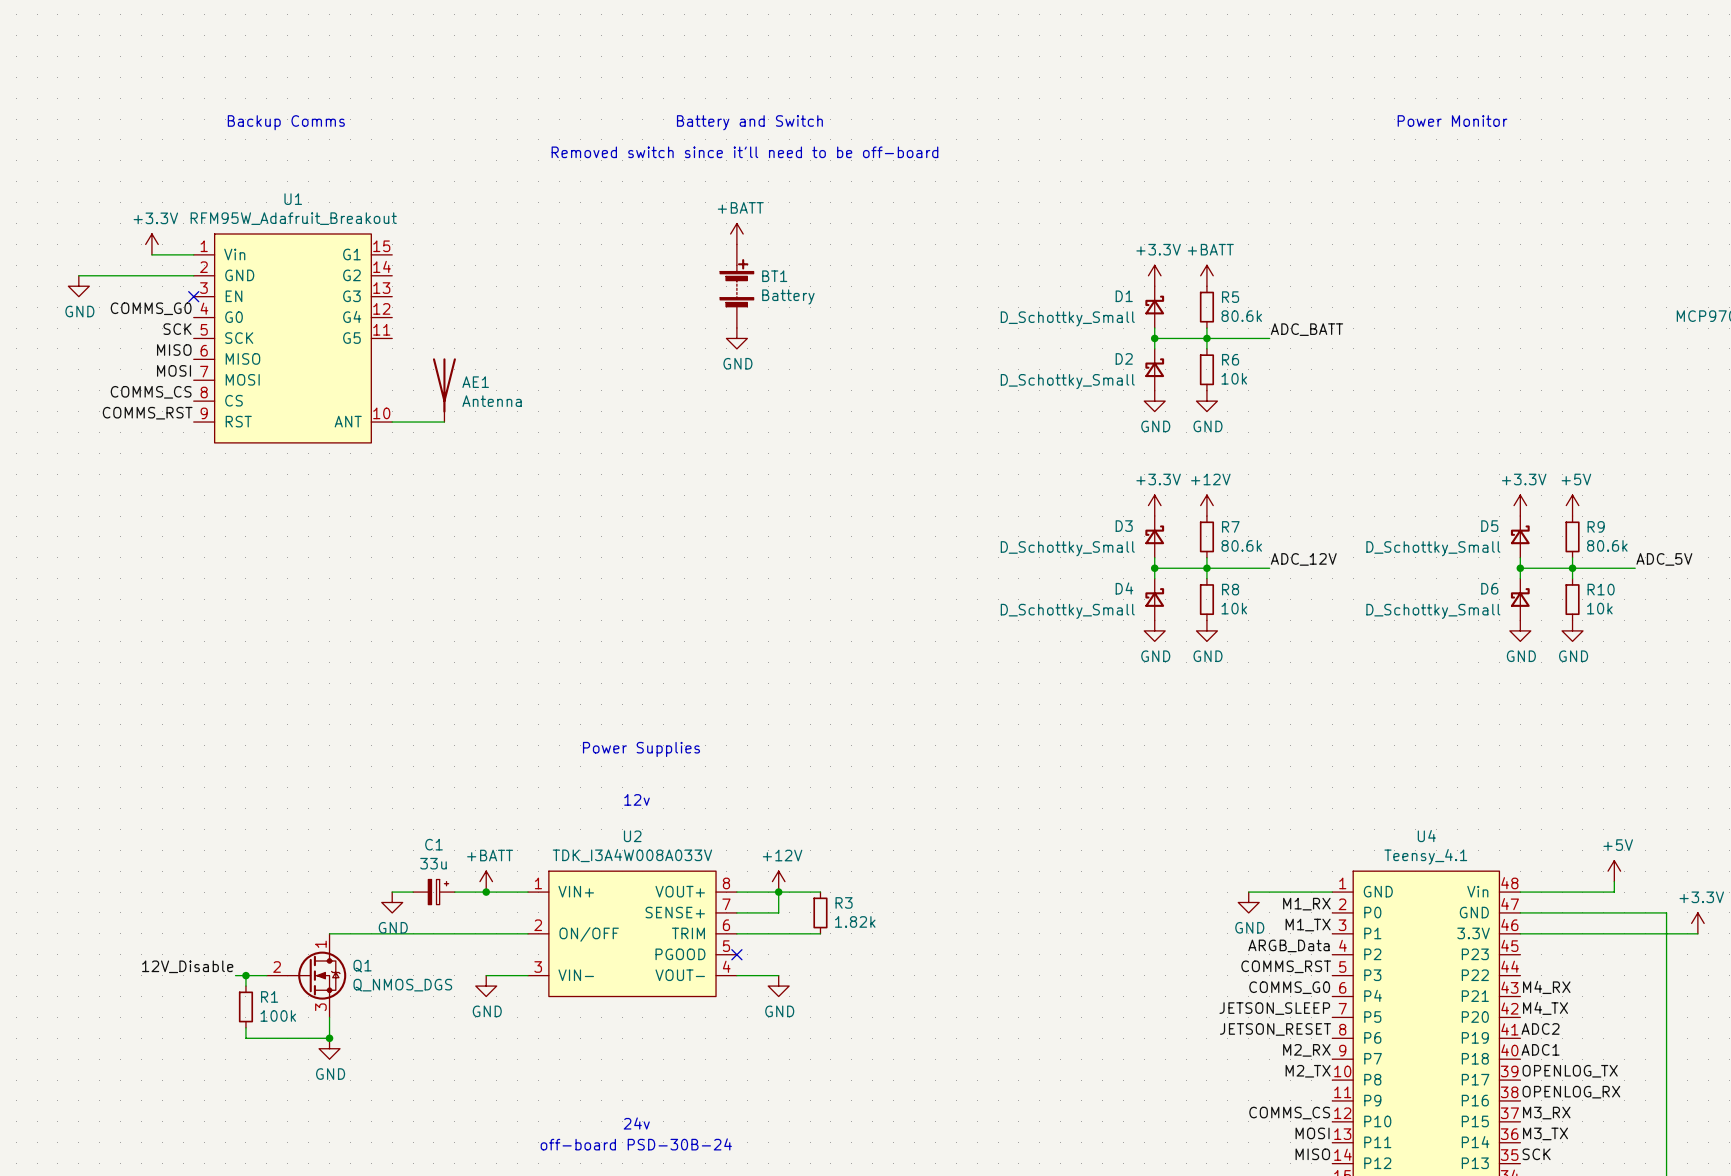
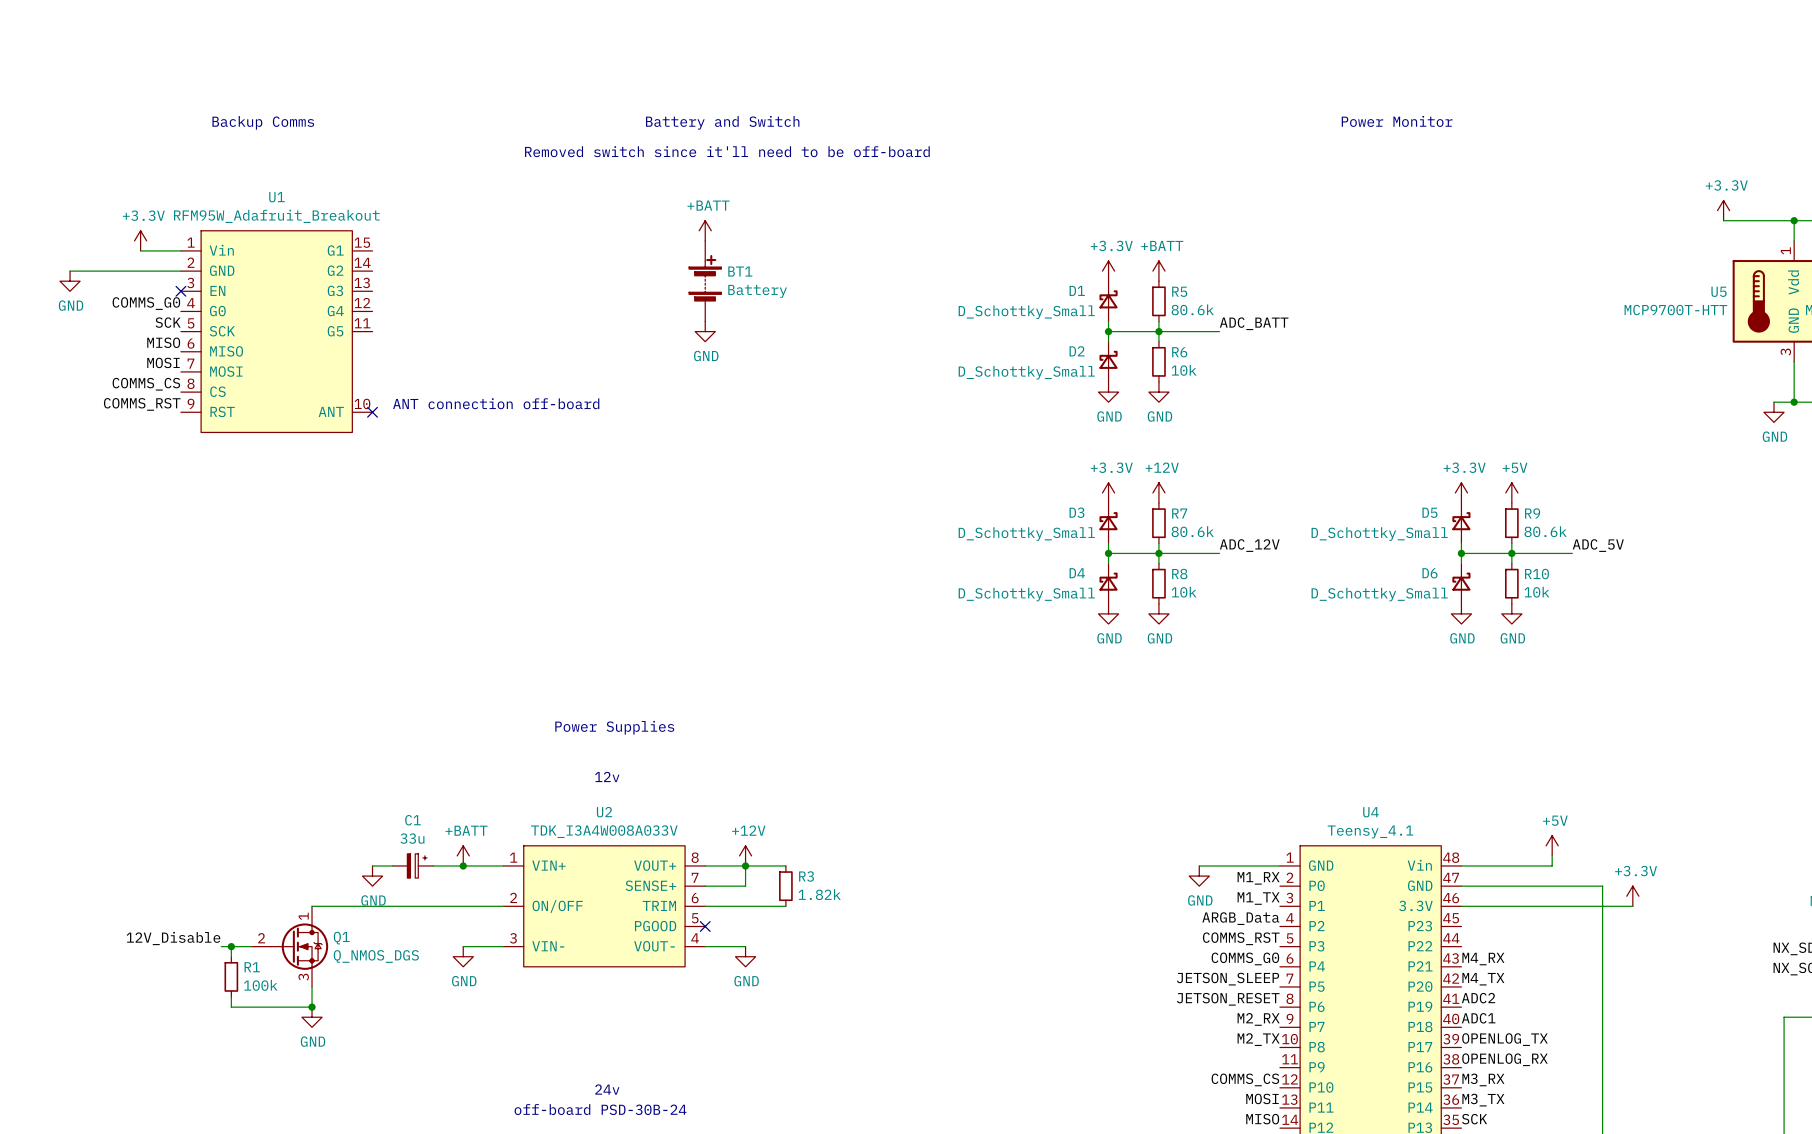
AE1: Antenna (444, 390) -> none
text: none -> ANT connection off-board (496, 403)
wire: (392, 422) (444, 422) -> none
no-connect mark: none -> (372, 412)

